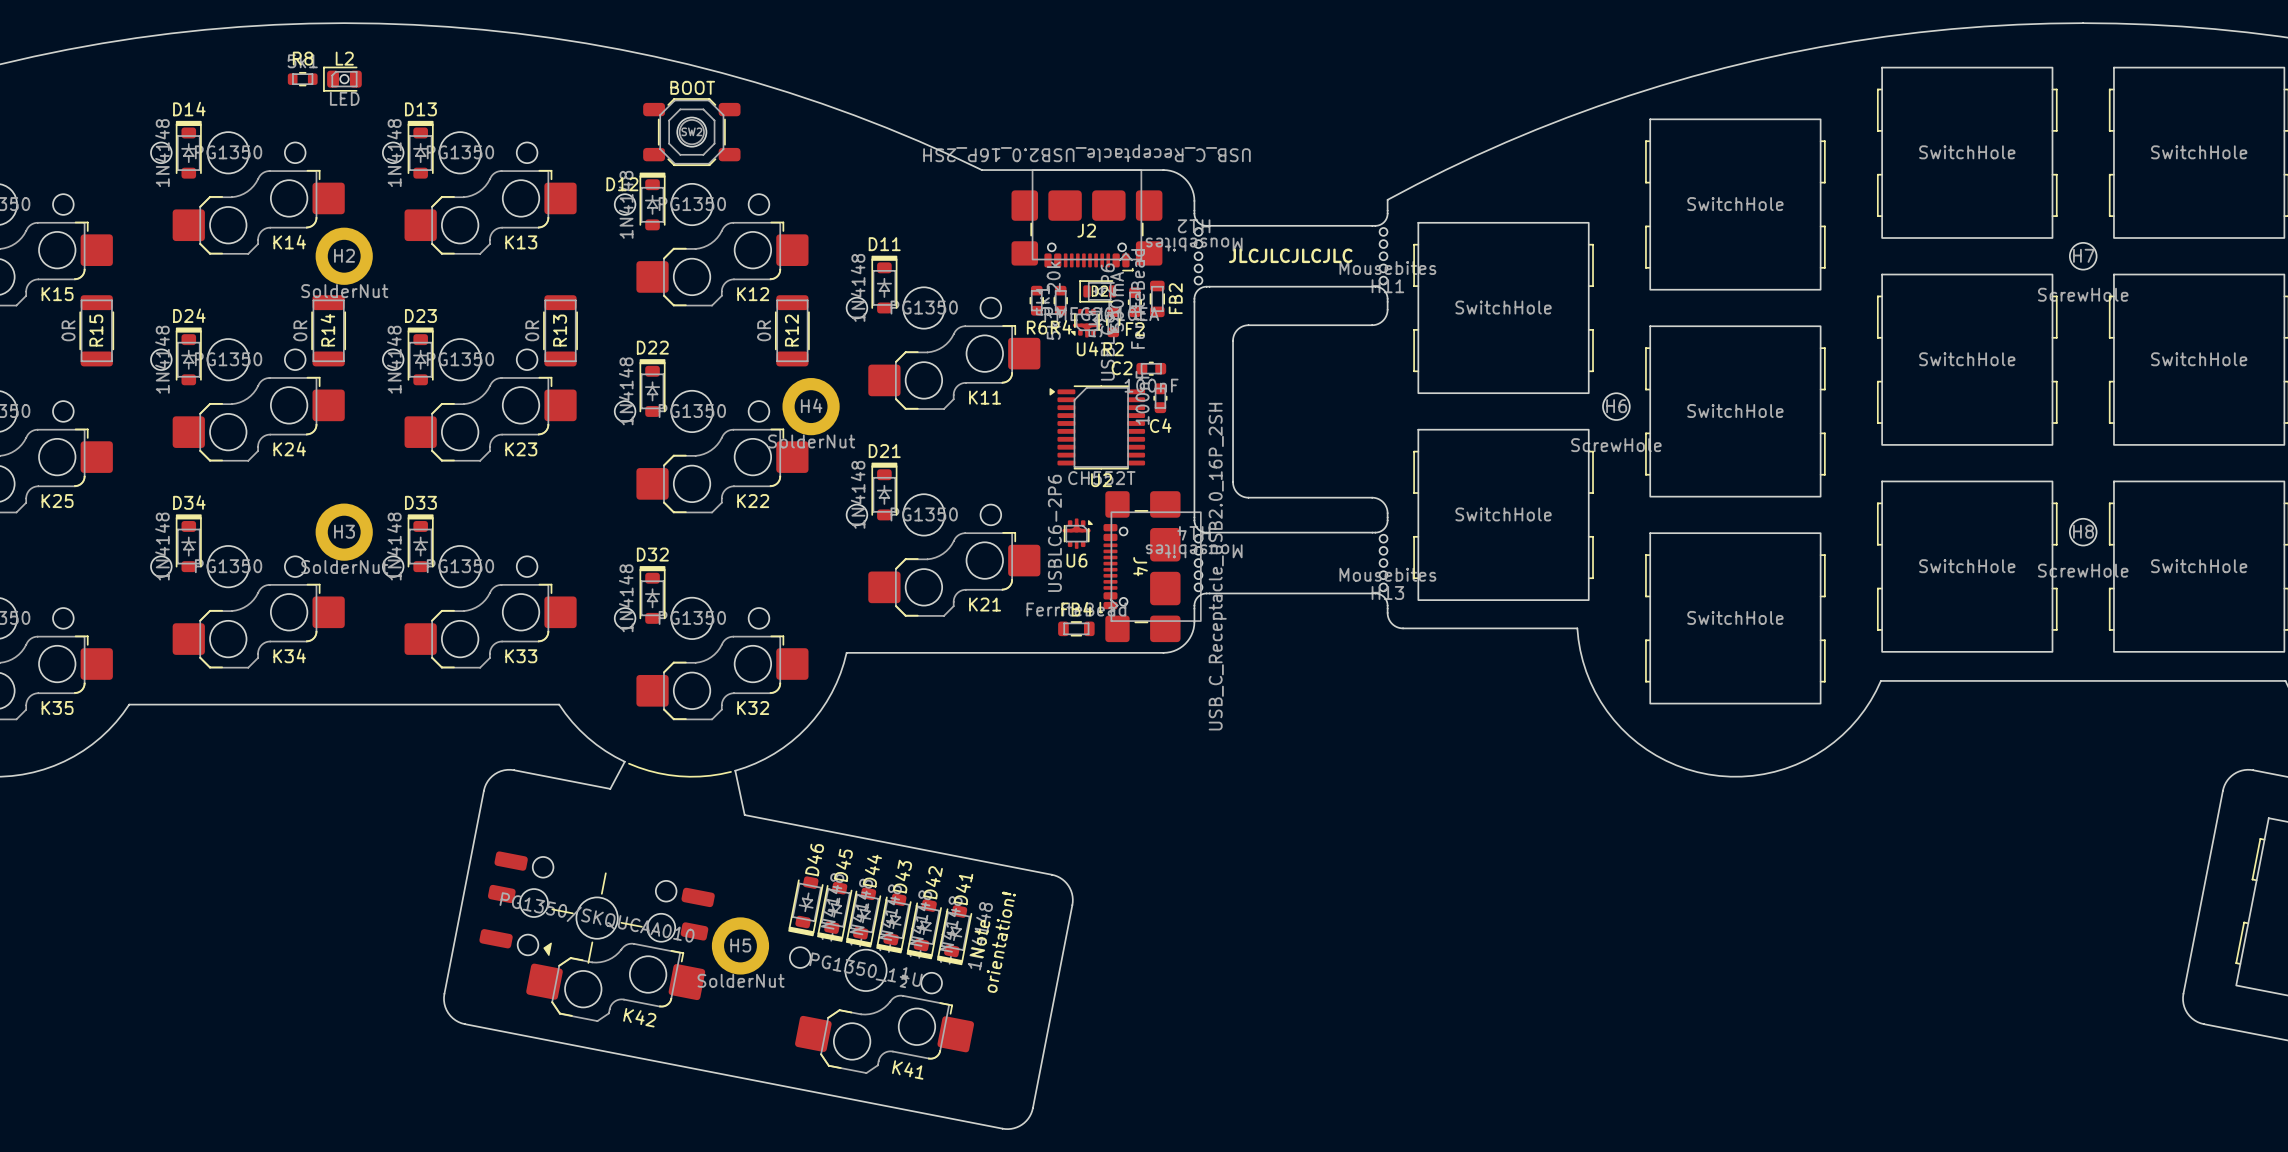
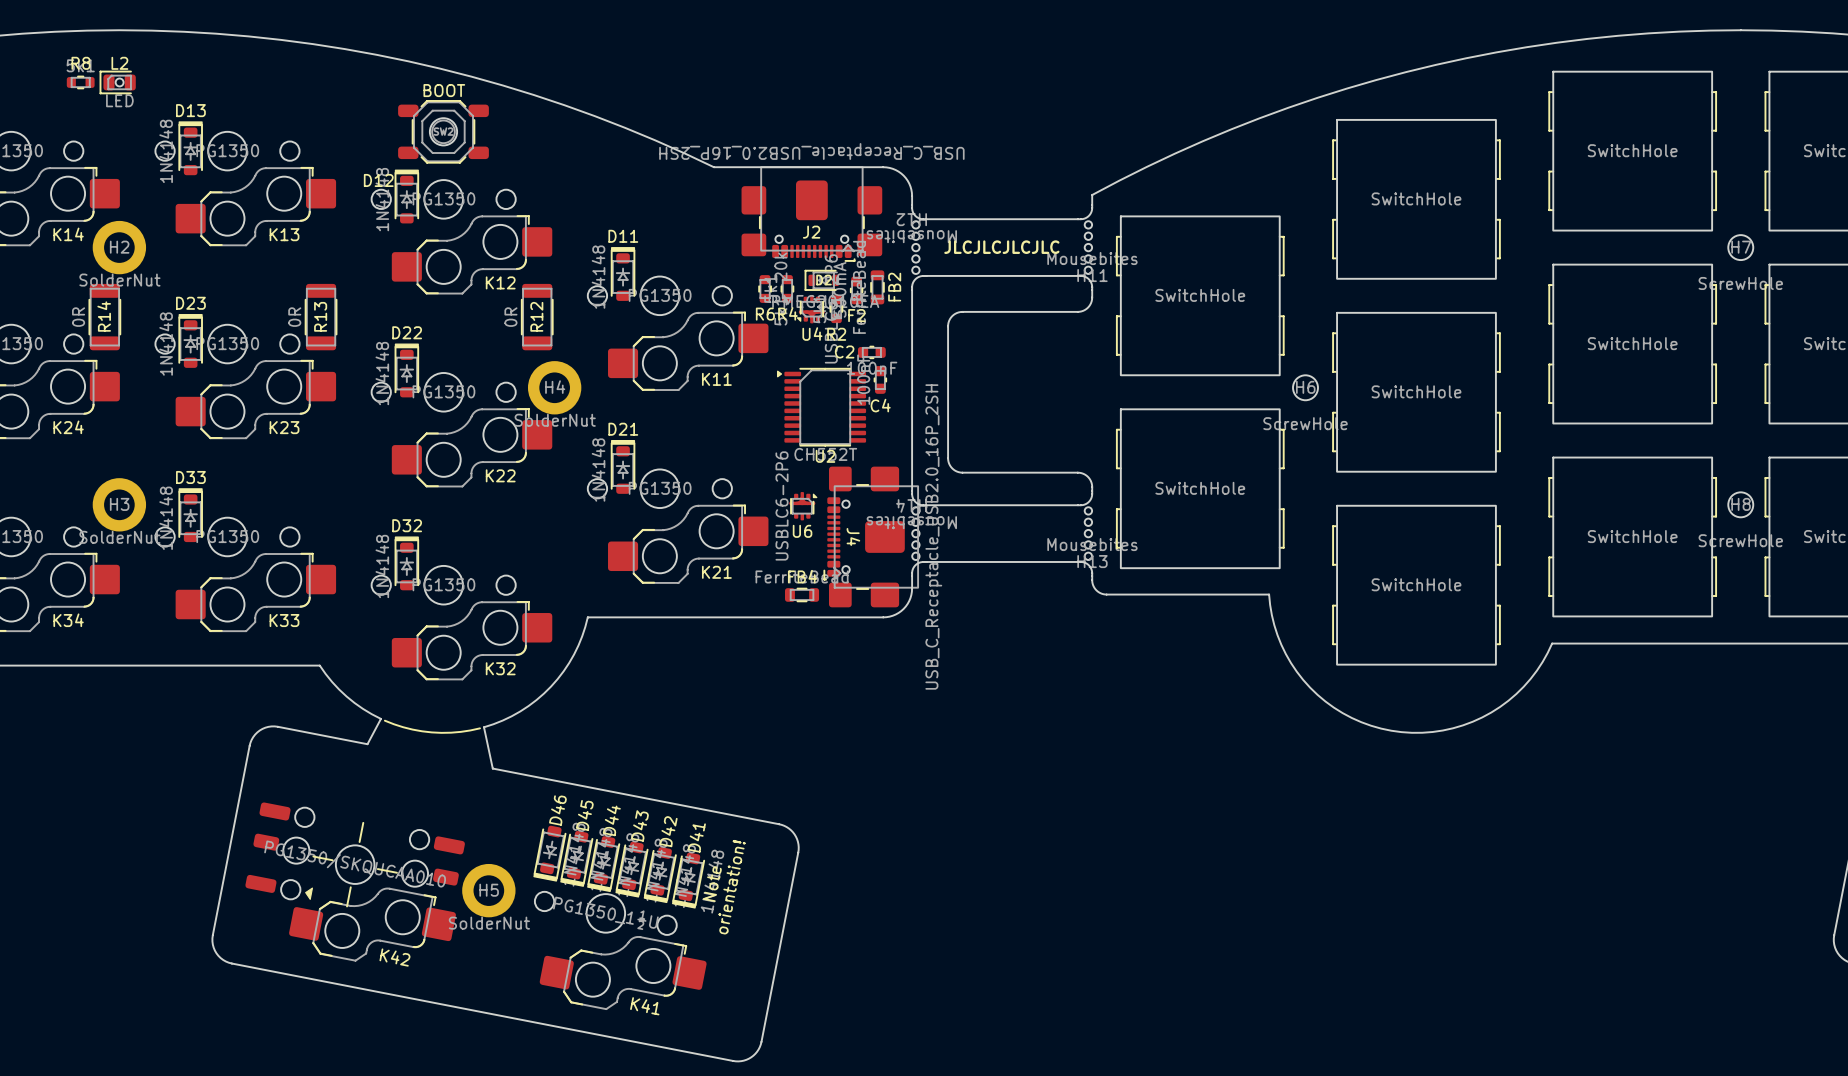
J2 footprint: [1011, 169, 1163, 272] -> [741, 166, 883, 262]
J4 footprint: [1099, 491, 1202, 643] -> [823, 466, 919, 608]

